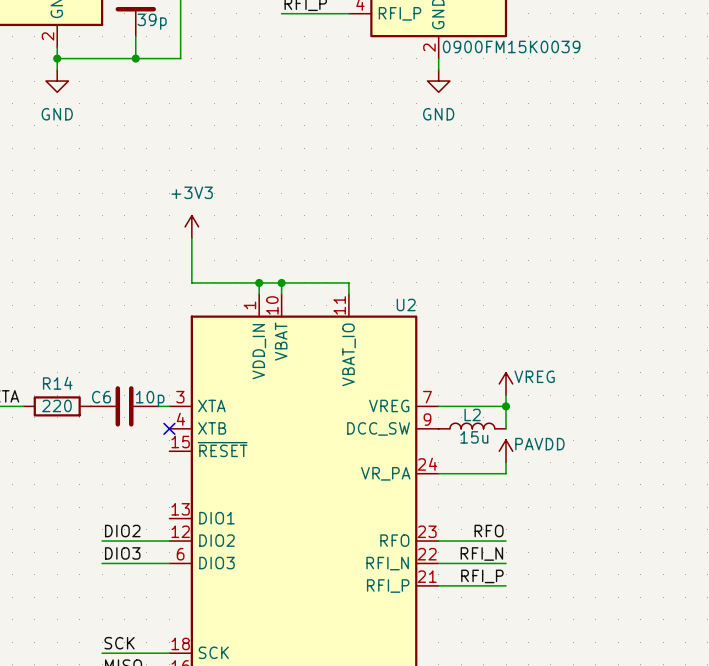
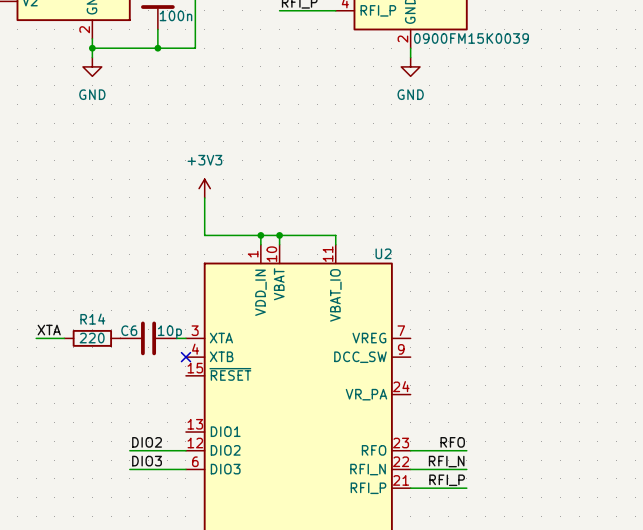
part value: 39p (152, 21) -> 100n (176, 15)
power symbol: VREG (506, 383) -> none
wire: (506, 395) (506, 428) -> none
wire: (438, 406) (506, 406) -> none
junction: (506, 406) -> none
L2: 15u (472, 426) -> none
power symbol: PAVDD (506, 451) -> none
wire: (506, 462) (506, 473) (438, 473) -> none

